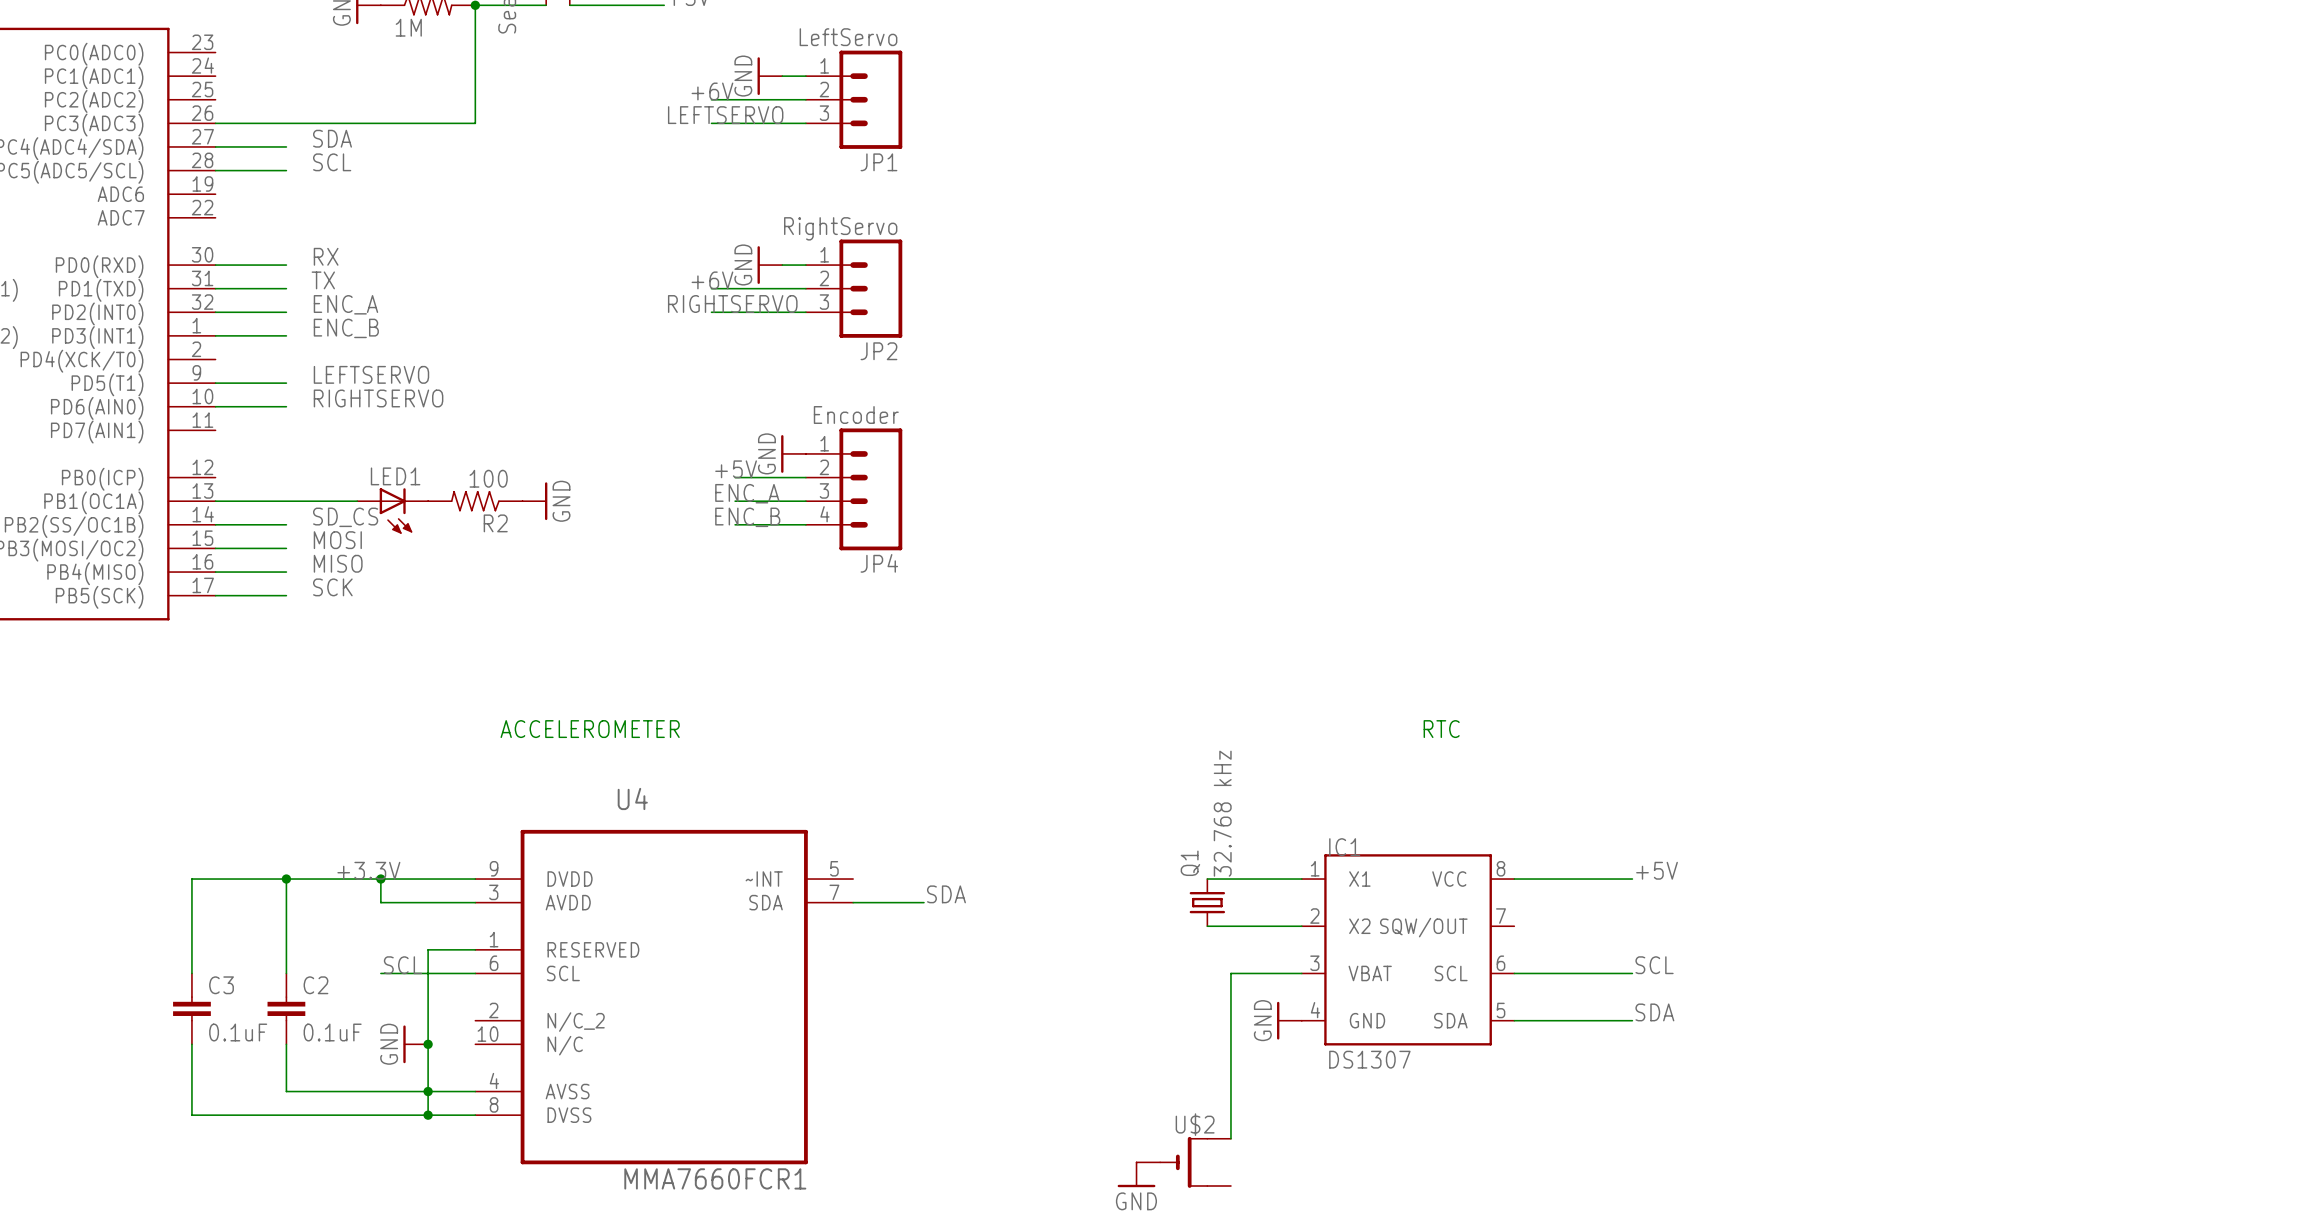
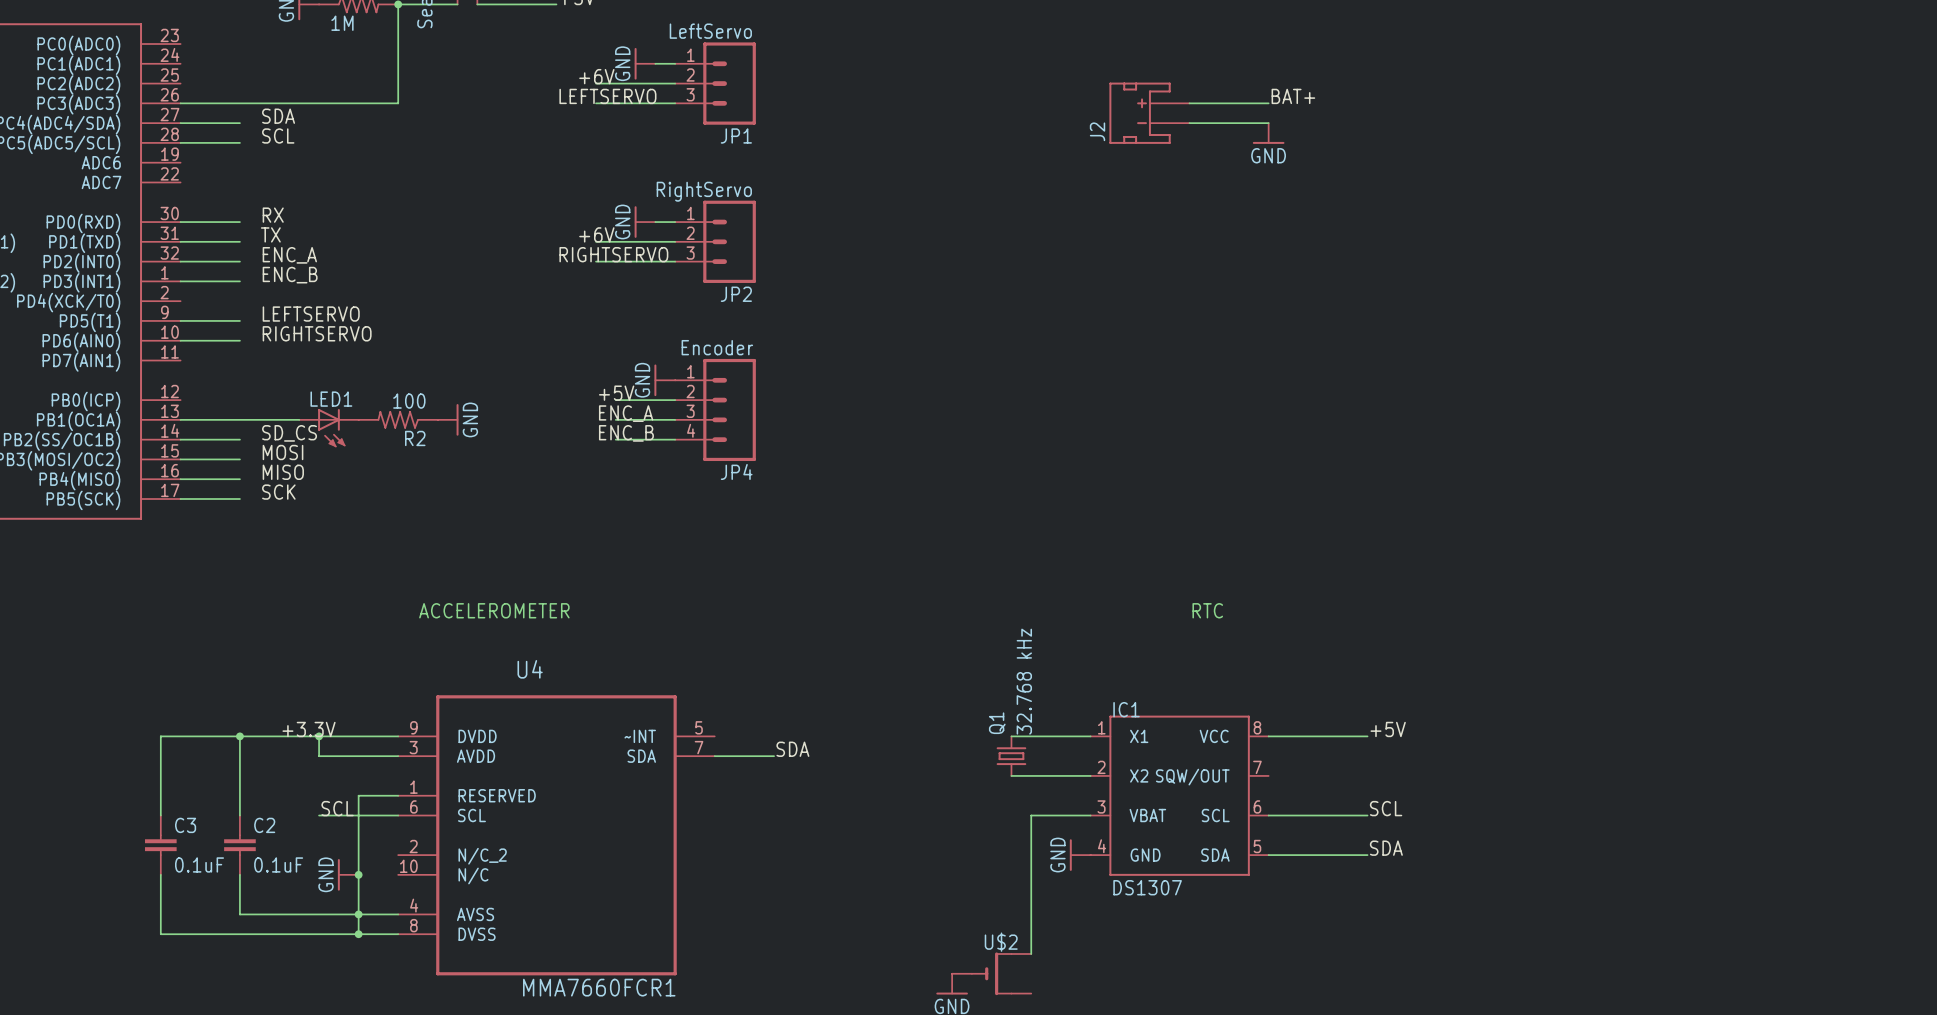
label: none -> BAT+ (1293, 96)
wire: none -> (1189, 103) (1268, 103)
J2: none -> (1149, 113)
wire: none -> (1189, 123) (1268, 123)
power symbol: none -> GND (1268, 133)

